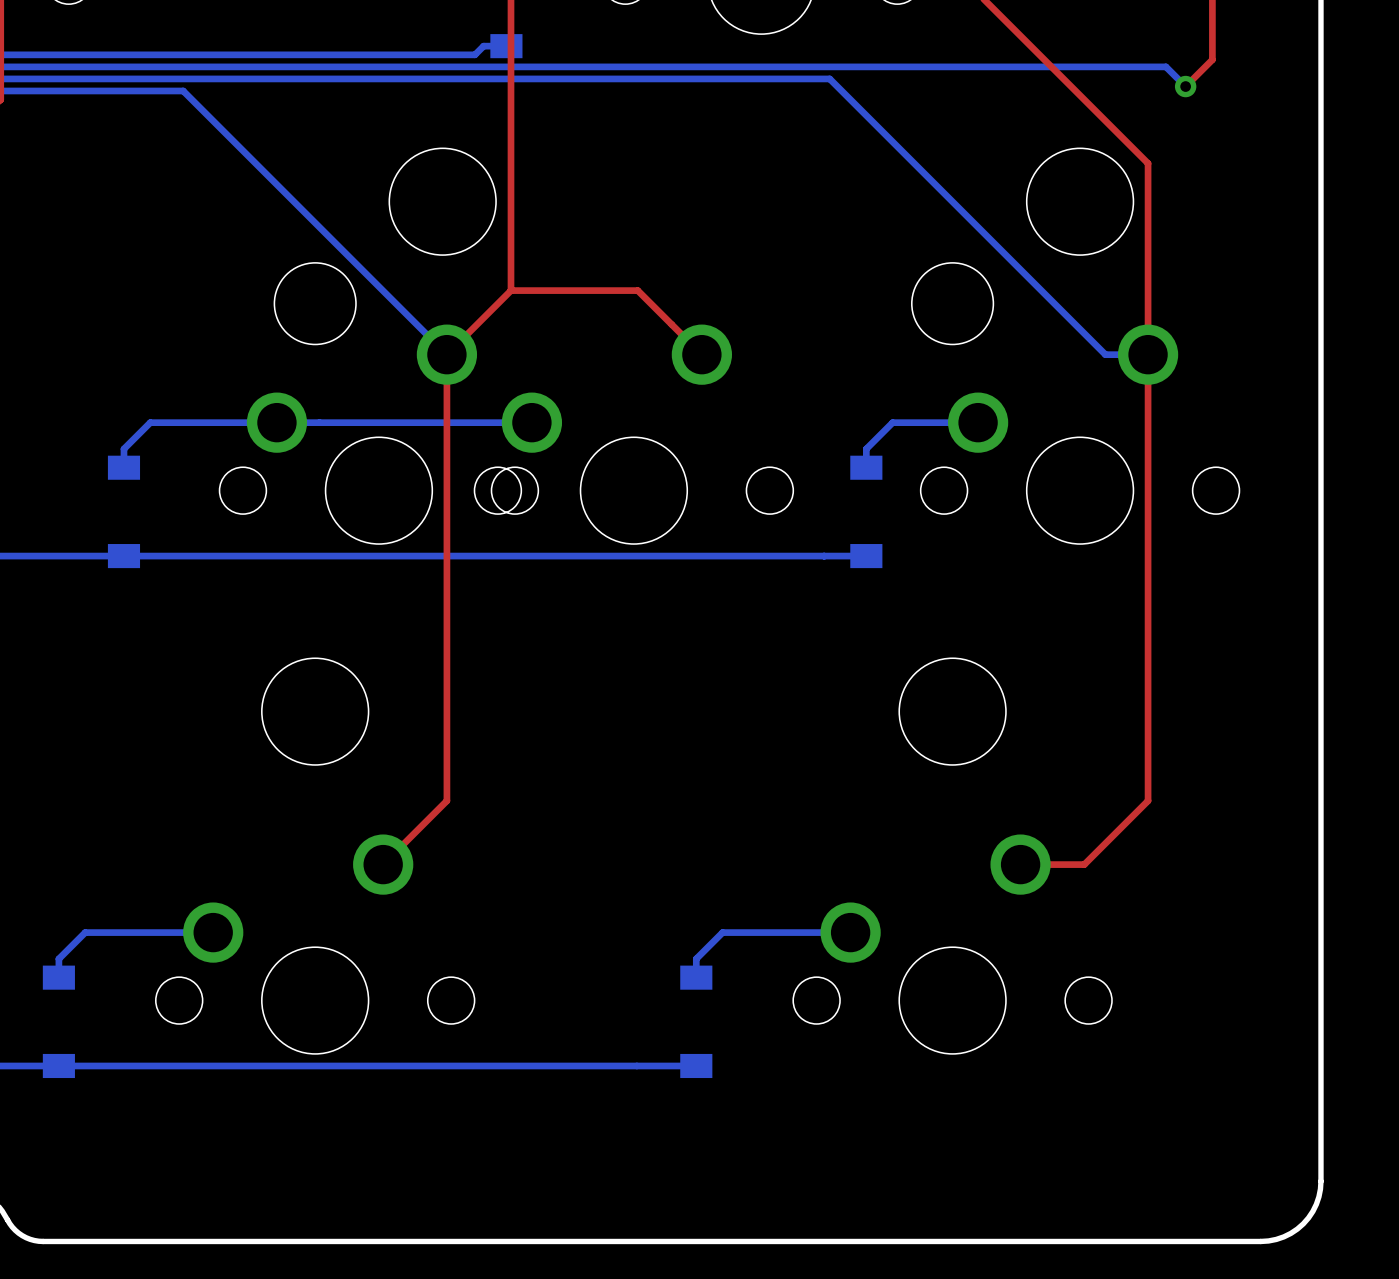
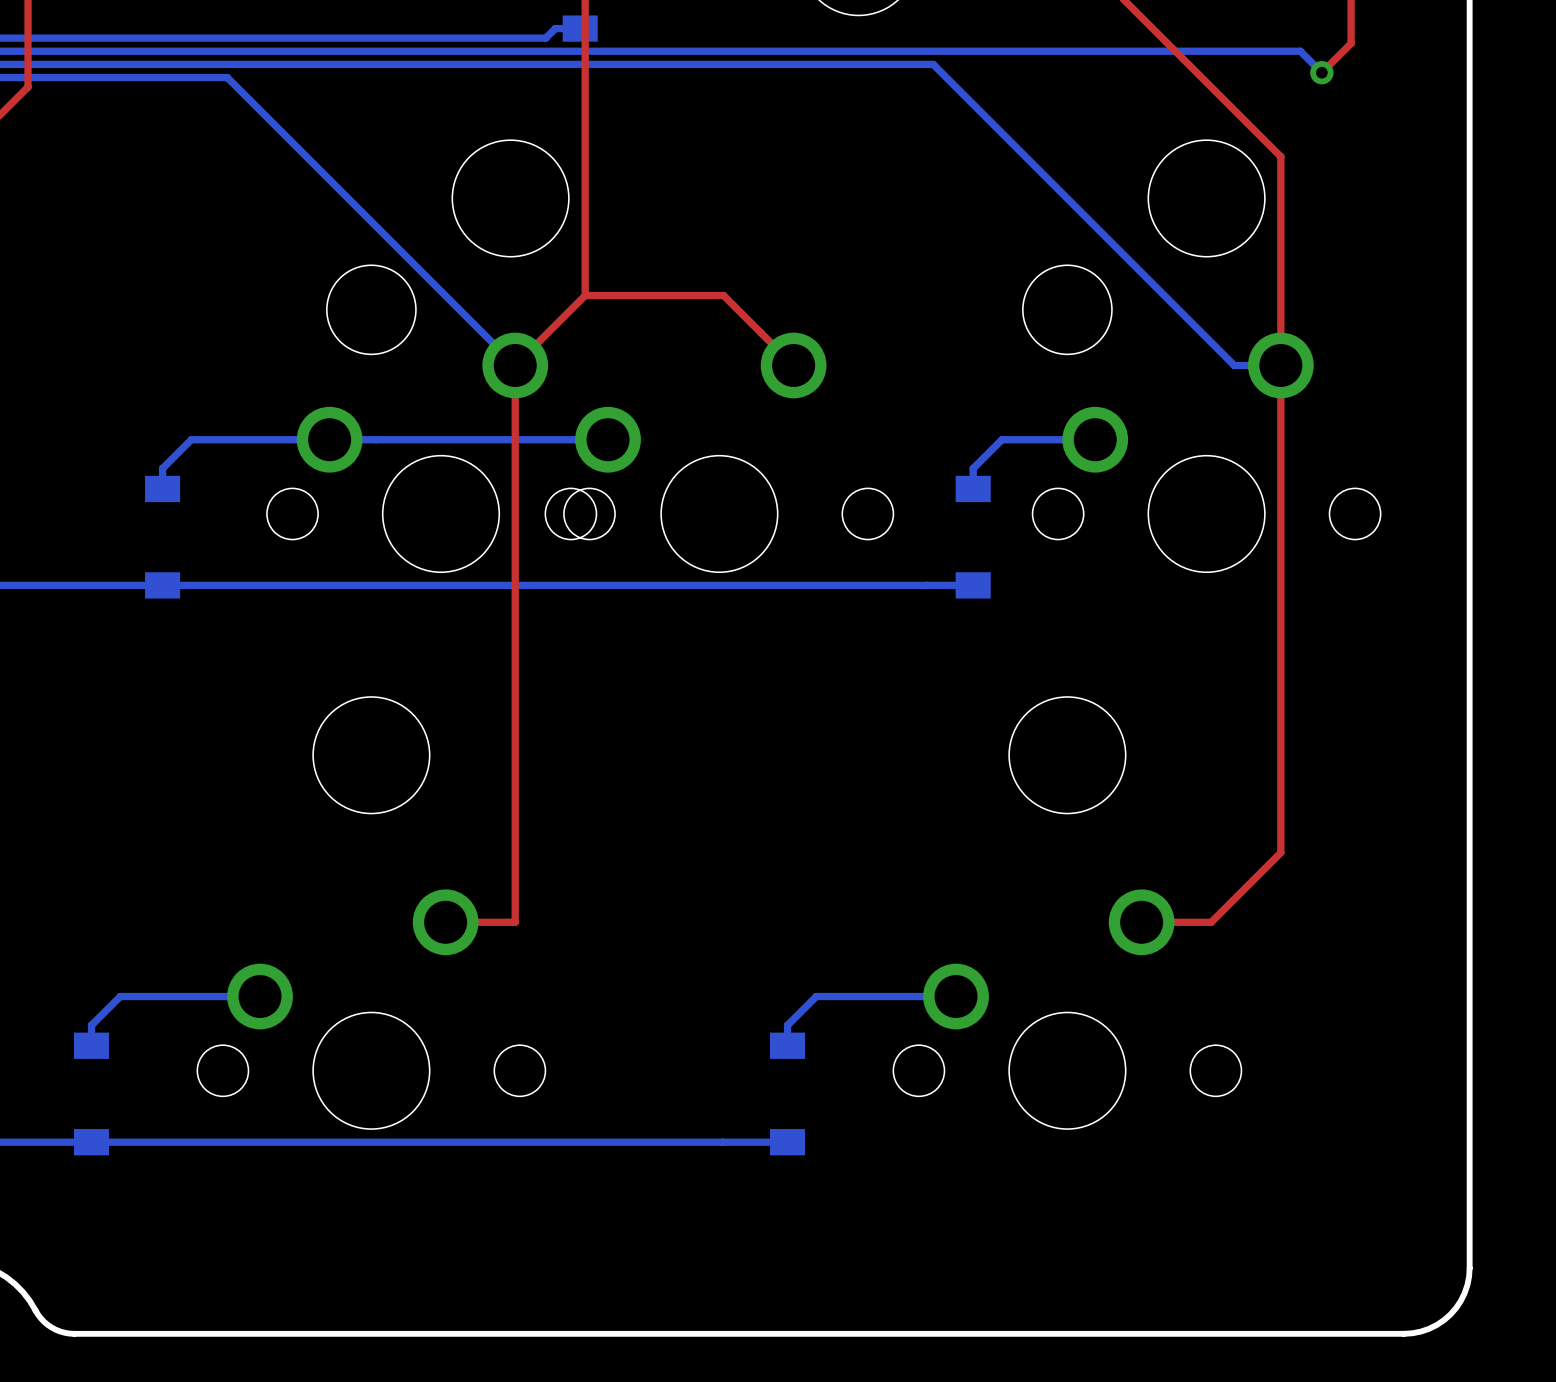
top track: (446, 800) (383, 864) -> (515, 852) (515, 922) (445, 922)

